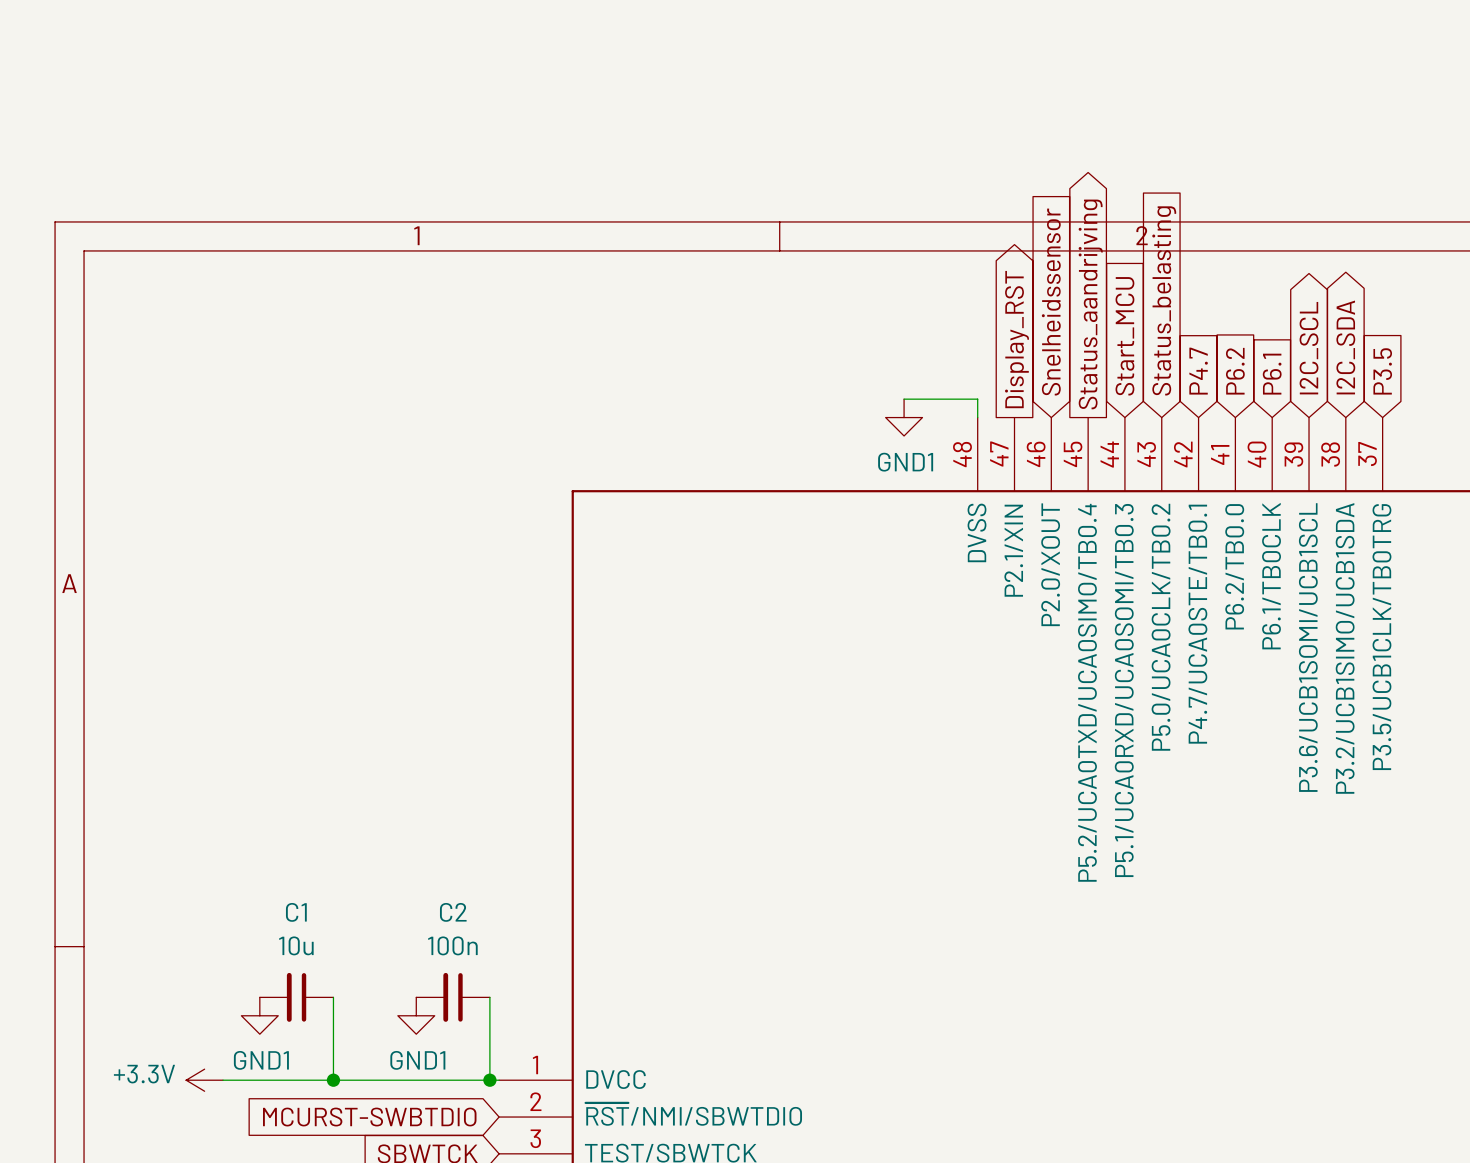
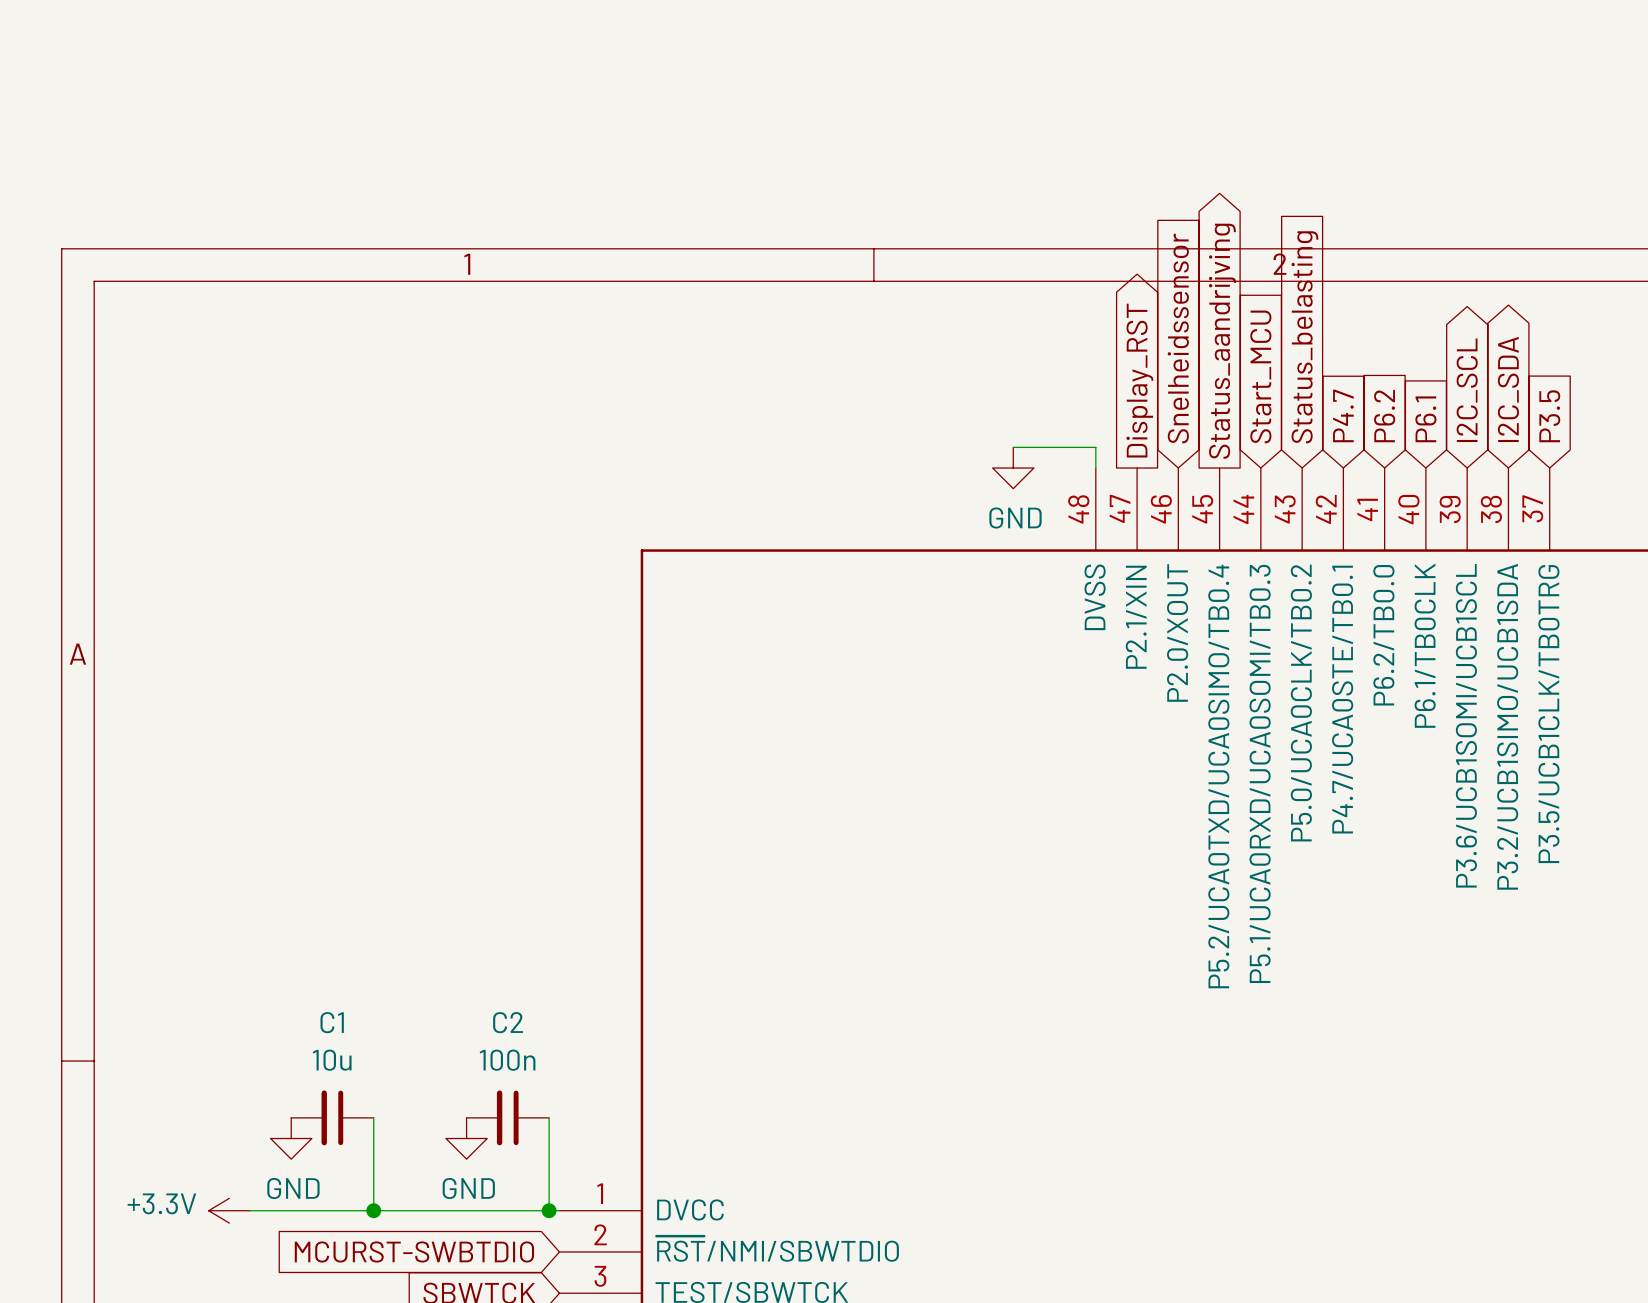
power symbol: GND1 (904, 417) -> GND (1013, 468)
power symbol: GND1 (259, 1015) -> GND (291, 1138)
power symbol: GND1 (416, 1015) -> GND (466, 1138)

